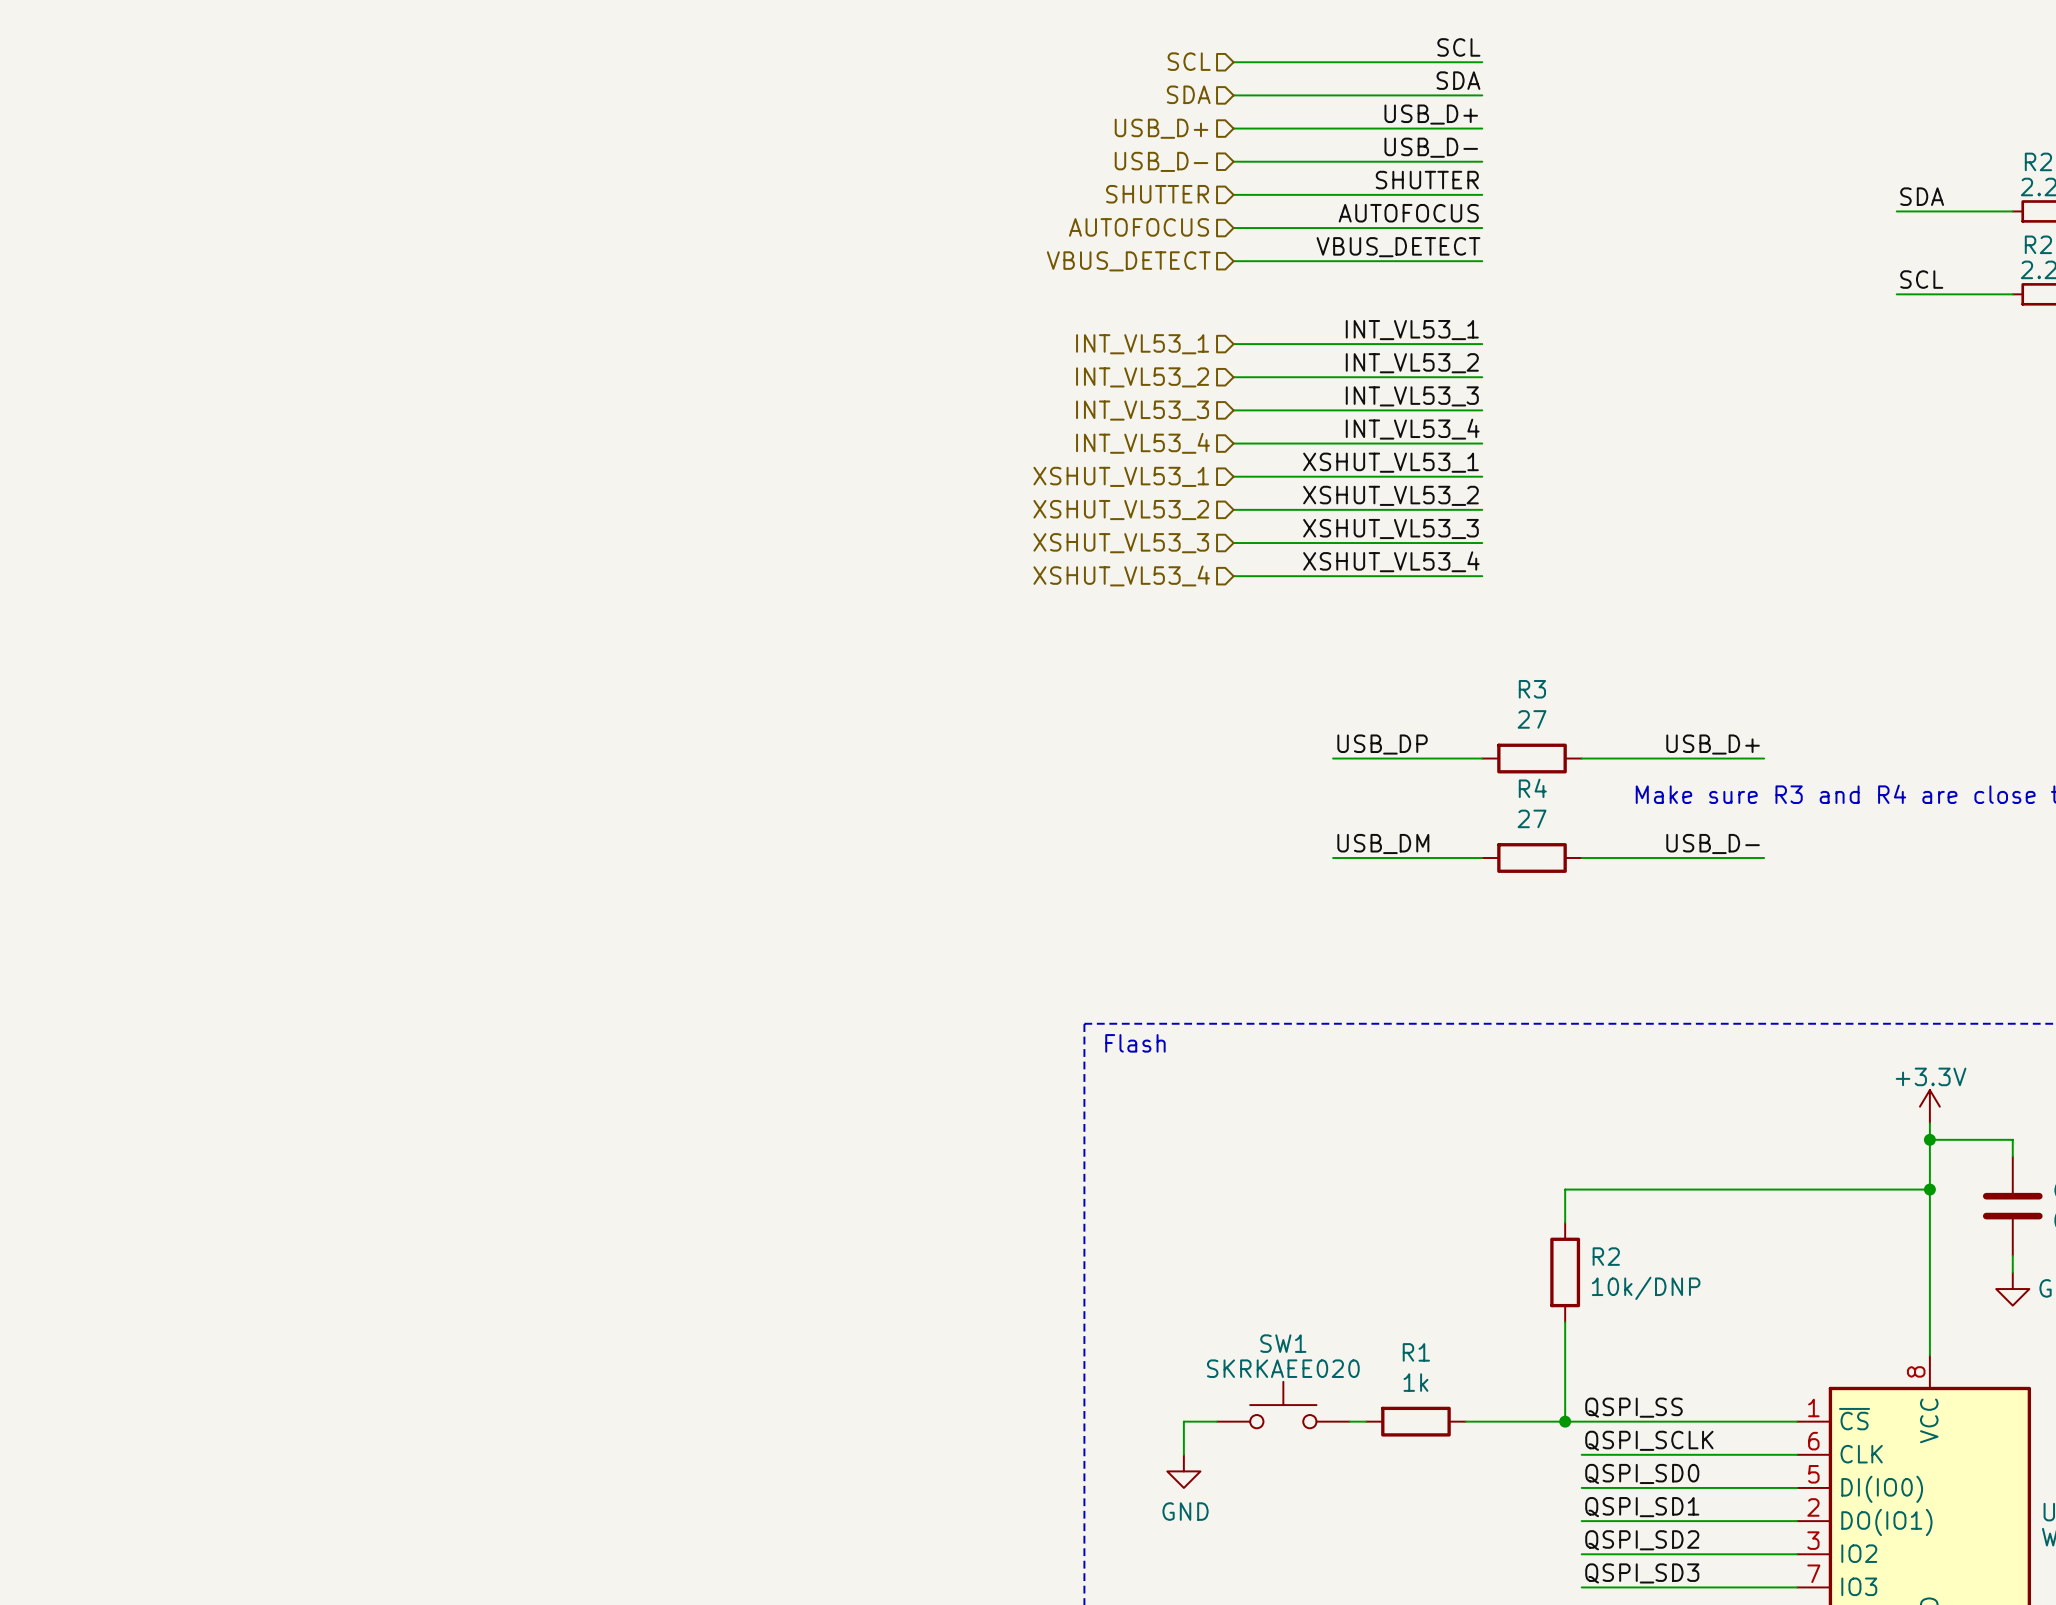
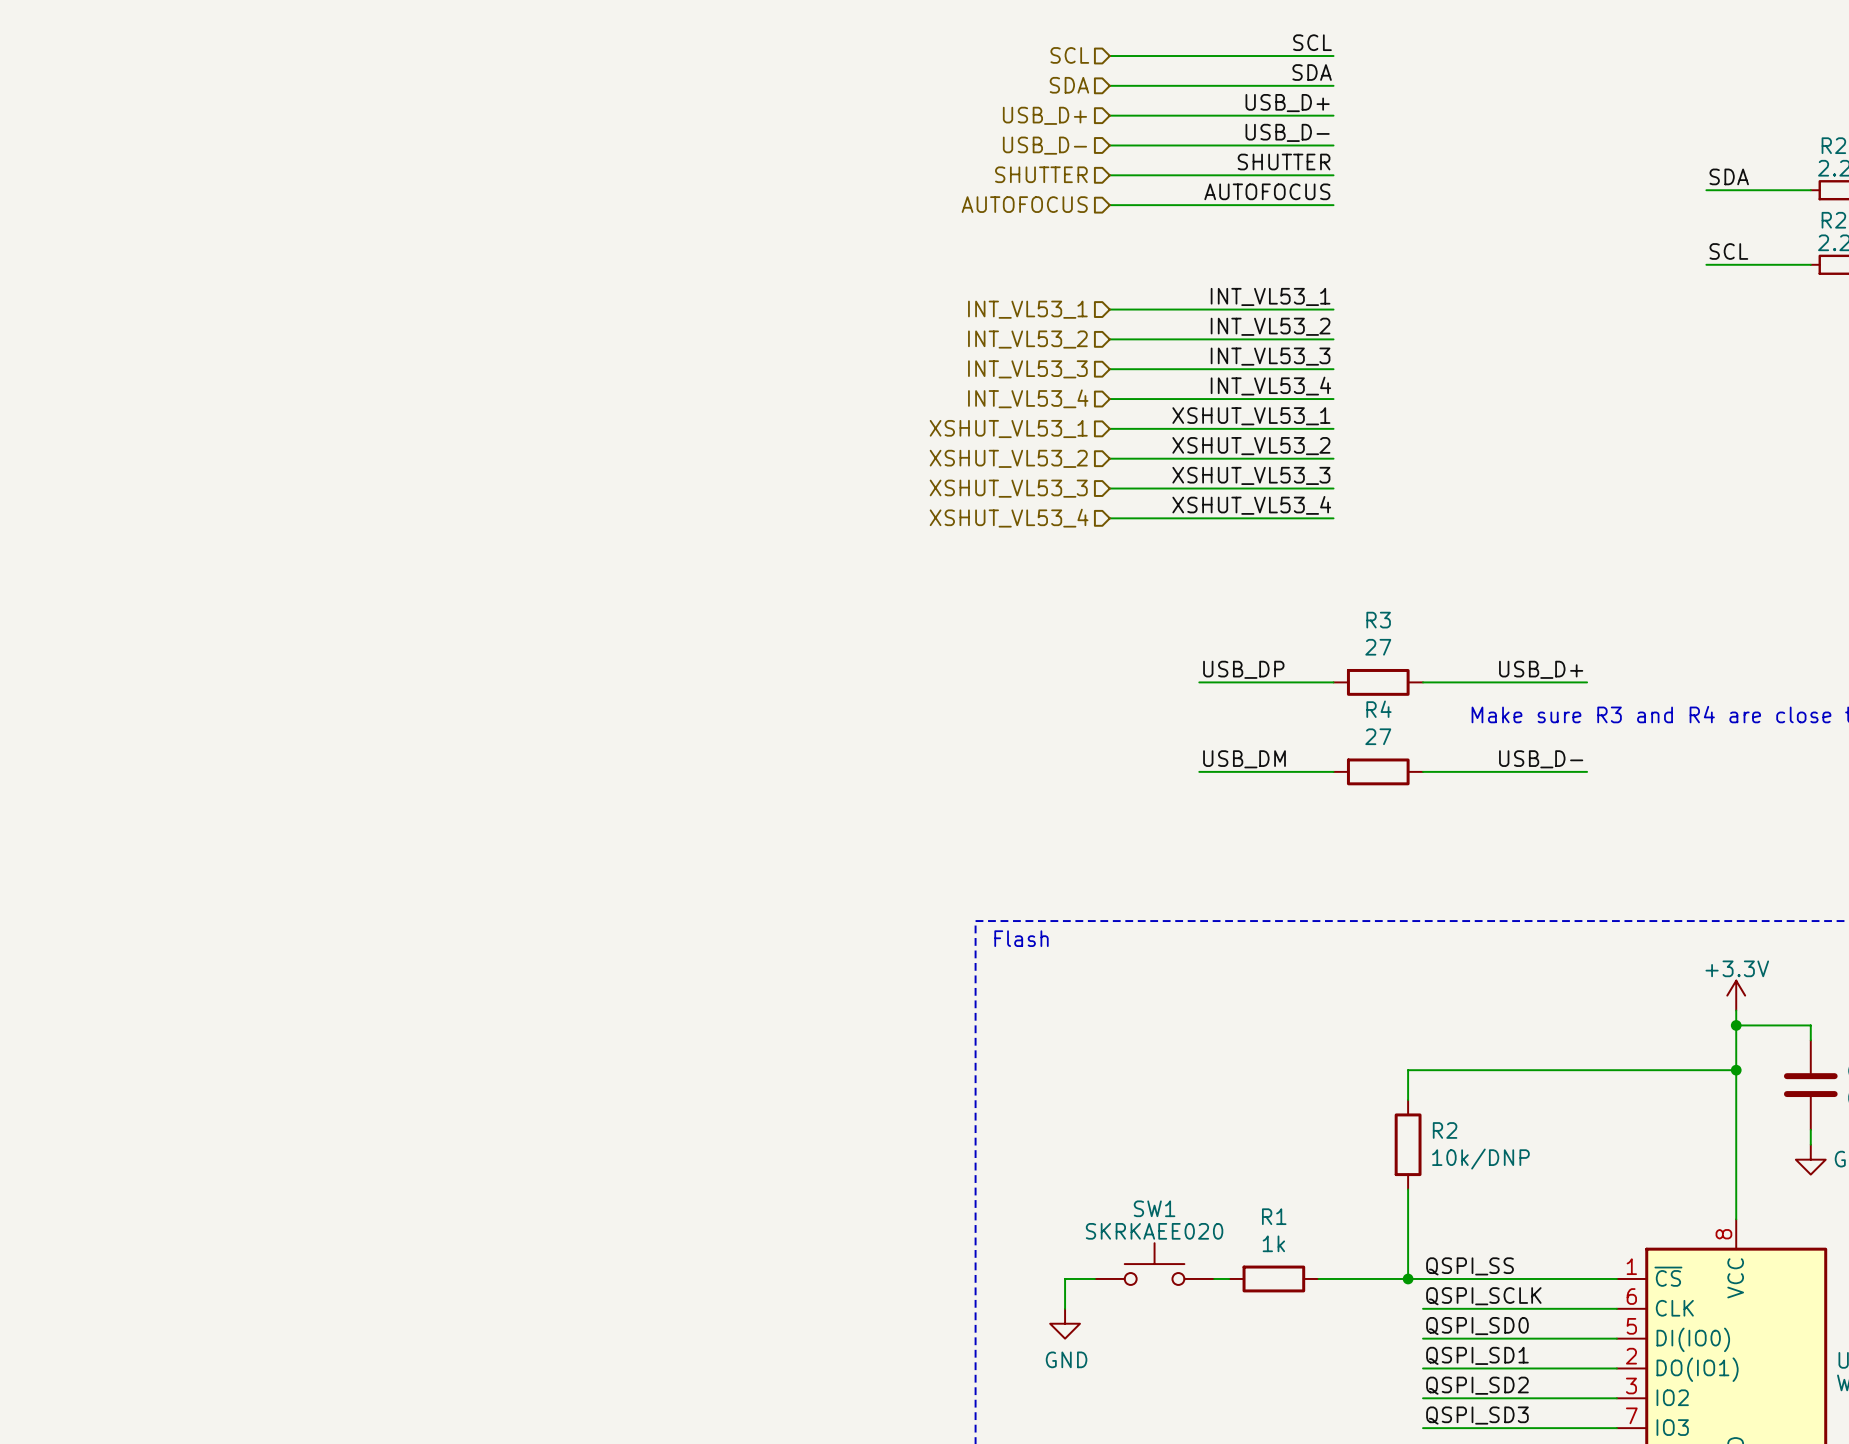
label: VBUS_DETECT (1398, 247) -> none
hierarchical label: VBUS_DETECT (1128, 261) -> none
wire: (1233, 261) (1482, 261) -> none

